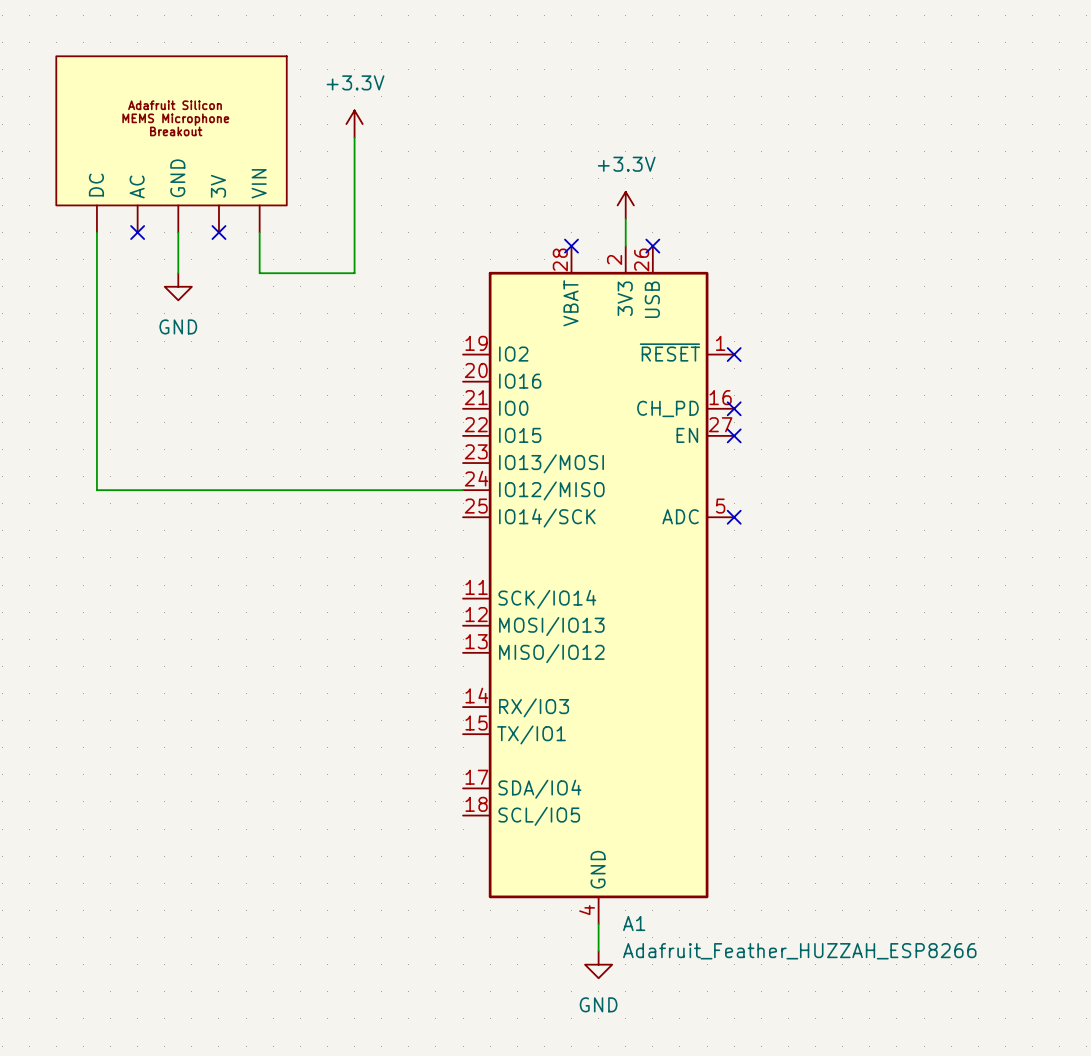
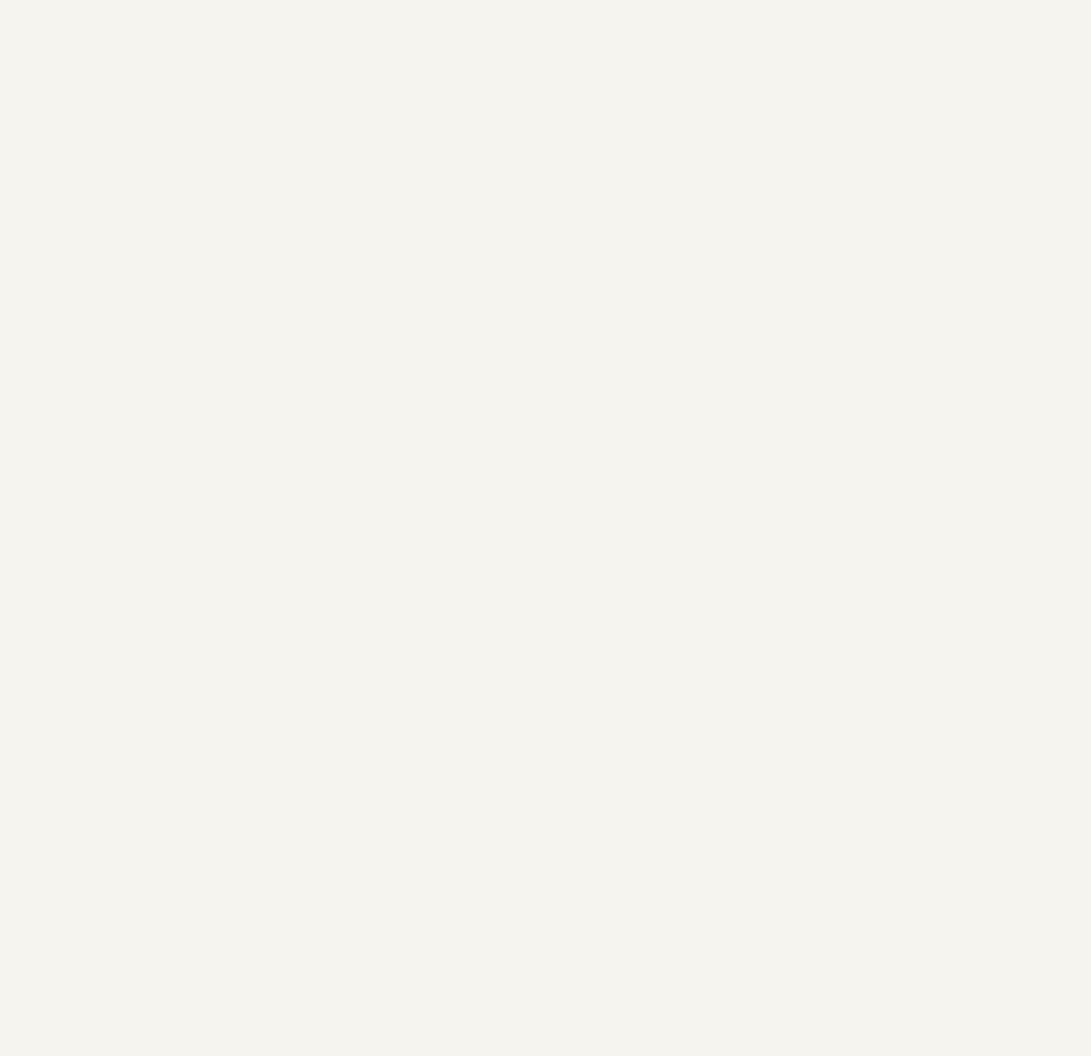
power symbol: +3.3V (354, 124) -> none
wire: (354, 137) (354, 273) (259, 273) (259, 232) -> none
part: (171, 144) -> none
power symbol: +3.3V (625, 205) -> none
wire: (625, 218) (625, 246) -> none
wire: (96, 232) (96, 490) (463, 490) -> none
no-connect mark: (137, 232) -> none
wire: (178, 232) (178, 273) -> none
no-connect mark: (218, 232) -> none
no-connect mark: (571, 246) -> none
no-connect mark: (652, 246) -> none
power symbol: GND (178, 286) -> none
no-connect mark: (734, 354) -> none
no-connect mark: (734, 408) -> none
no-connect mark: (734, 435) -> none
no-connect mark: (734, 517) -> none
A1: Adafruit_Feather_HUZZAH_ESP8266 (598, 585) -> none
wire: (598, 924) (598, 951) -> none
power symbol: GND (598, 964) -> none

